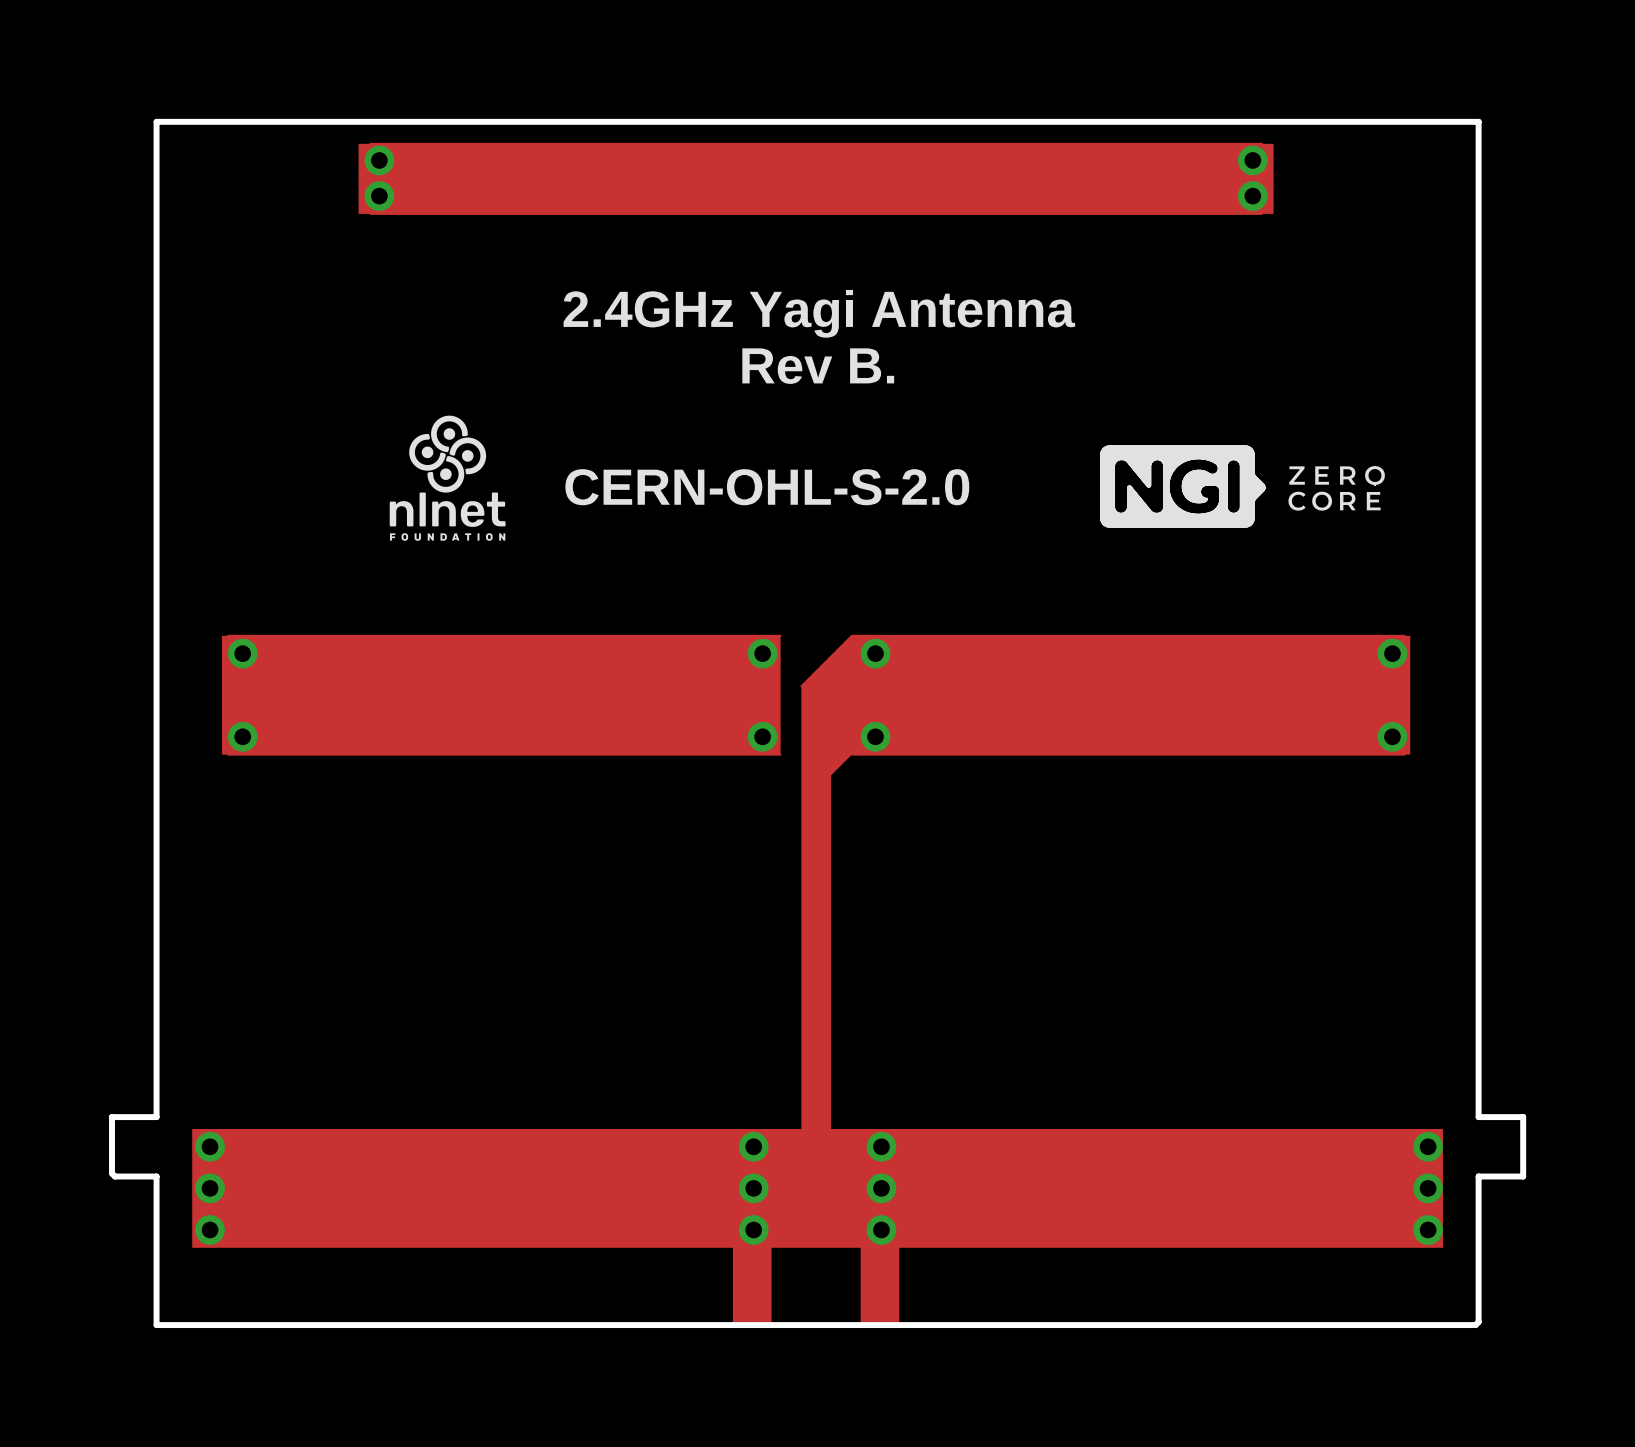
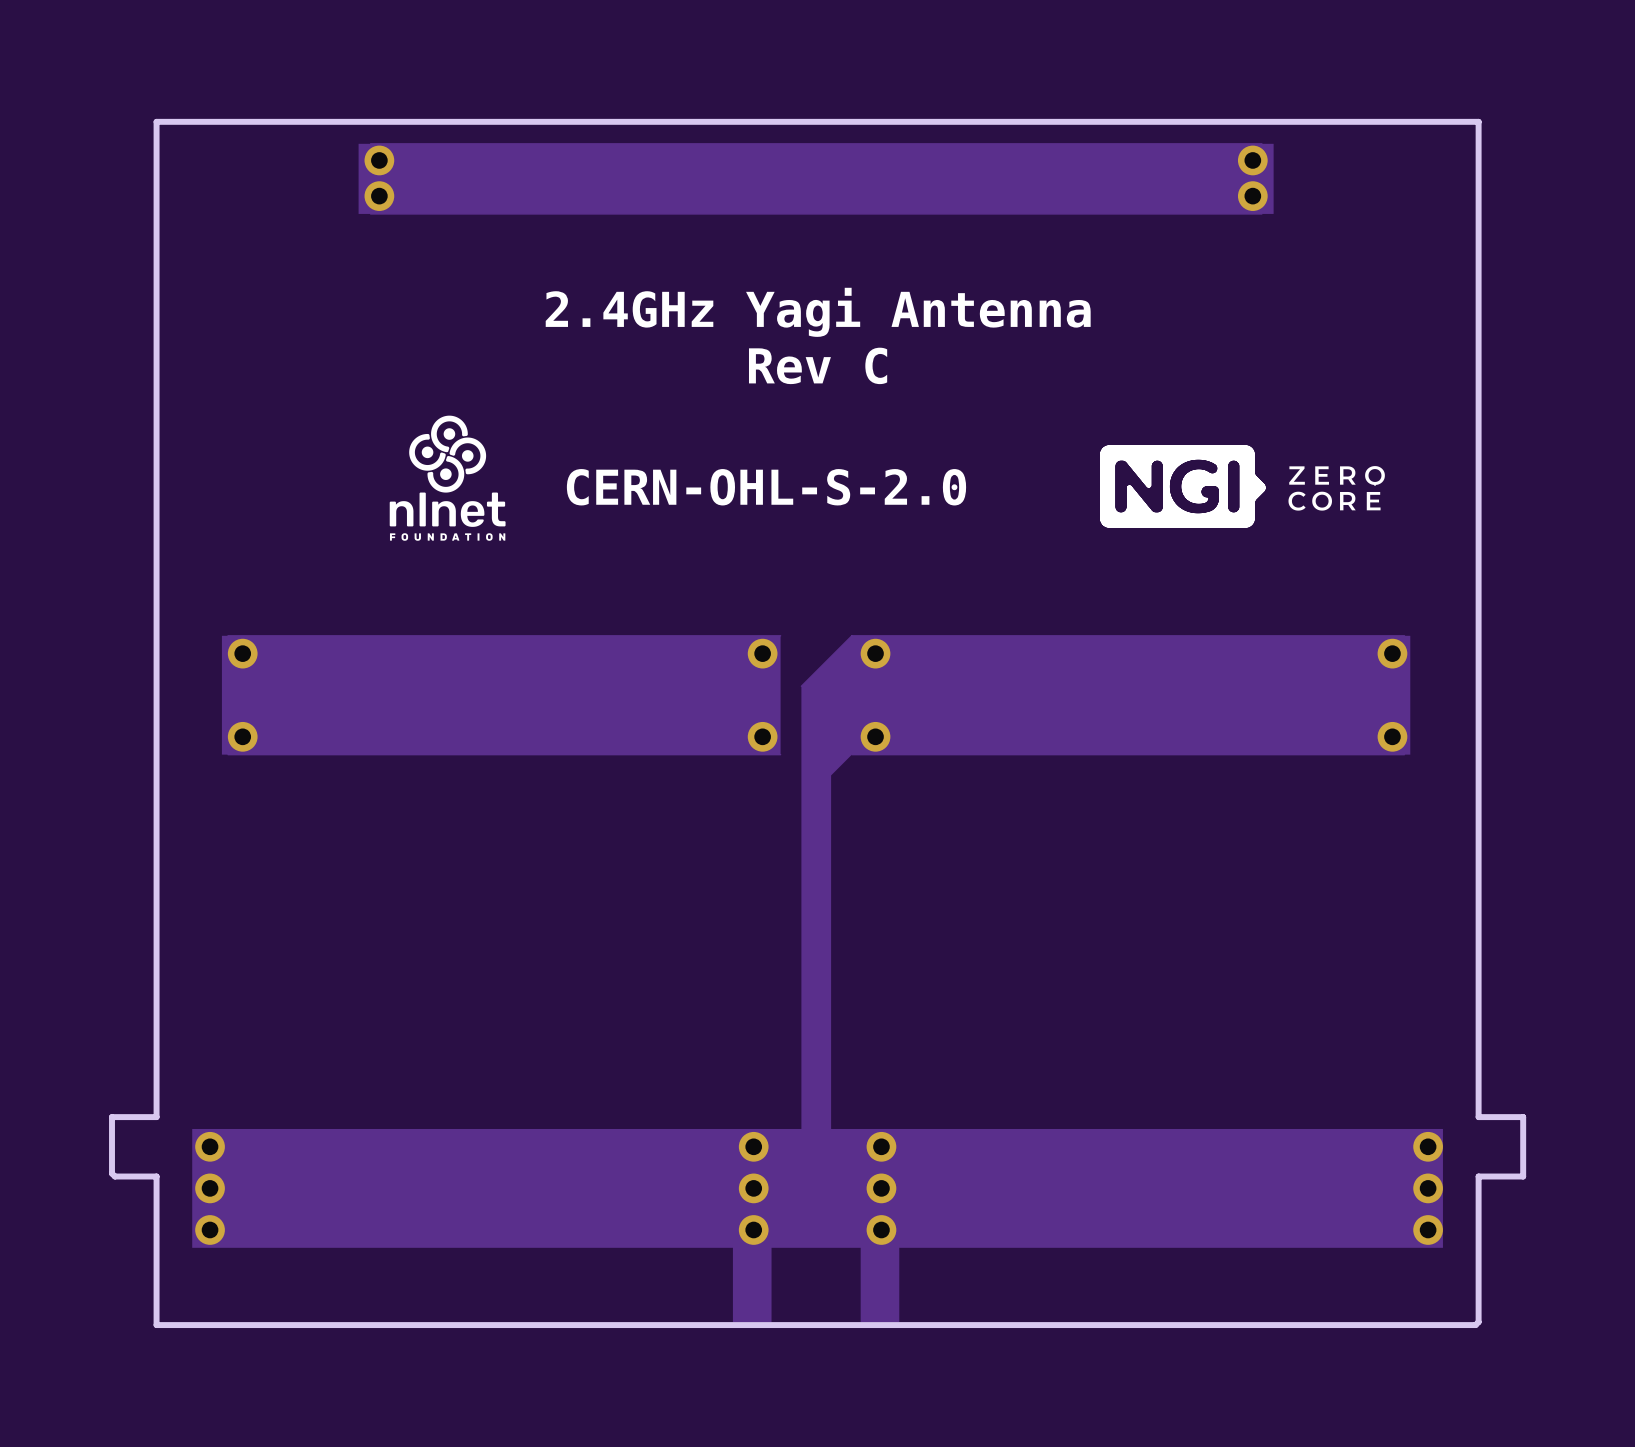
text: Rev B. (818, 366) -> Rev C (818, 365)

